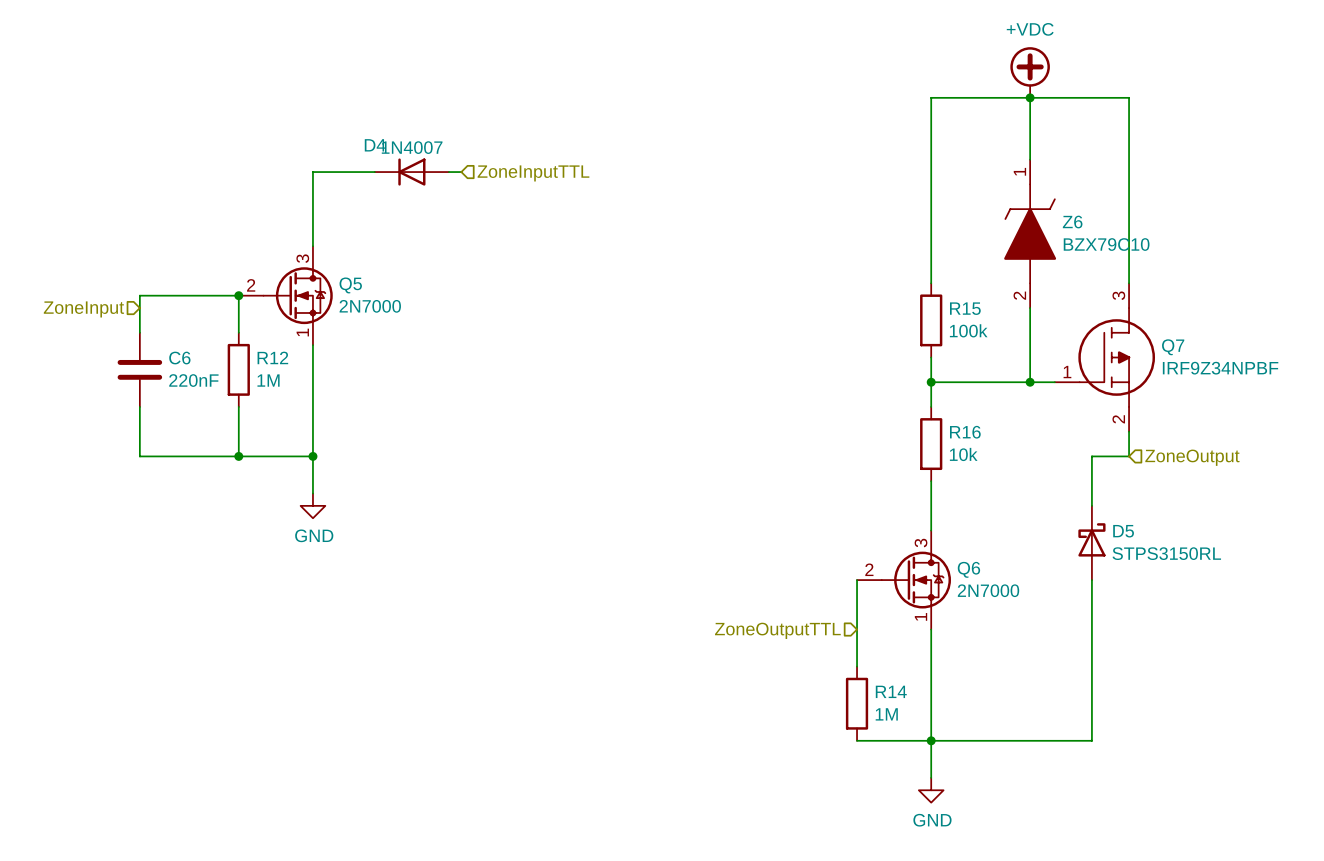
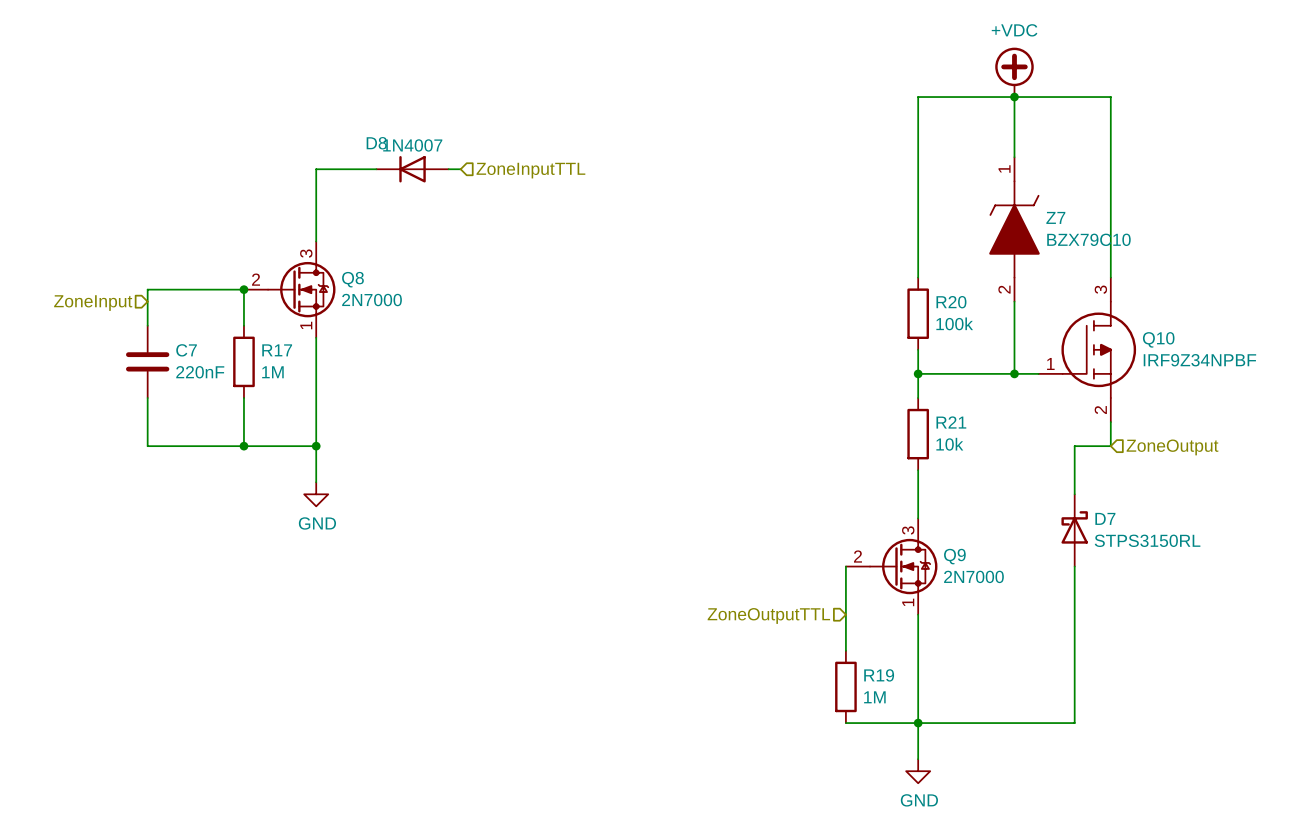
D4 name: D4 (375, 145) -> D8 (376, 143)
Z6 name: Z6 (1072, 222) -> Z7 (1055, 217)
Q5 name: Q5 (350, 285) -> Q8 (352, 279)
R15 name: R15 (965, 308) -> R20 (951, 302)
Q7 name: Q7 (1173, 347) -> Q10 (1158, 339)
R12 name: R12 (272, 357) -> R17 (277, 350)
C6 name: C6 (179, 358) -> C7 (186, 350)
R16 name: R16 (965, 432) -> R21 (951, 422)
D5 name: D5 (1123, 531) -> D7 (1105, 518)
Q6 name: Q6 (968, 569) -> Q9 (954, 556)
R14 name: R14 (891, 691) -> R19 (879, 675)

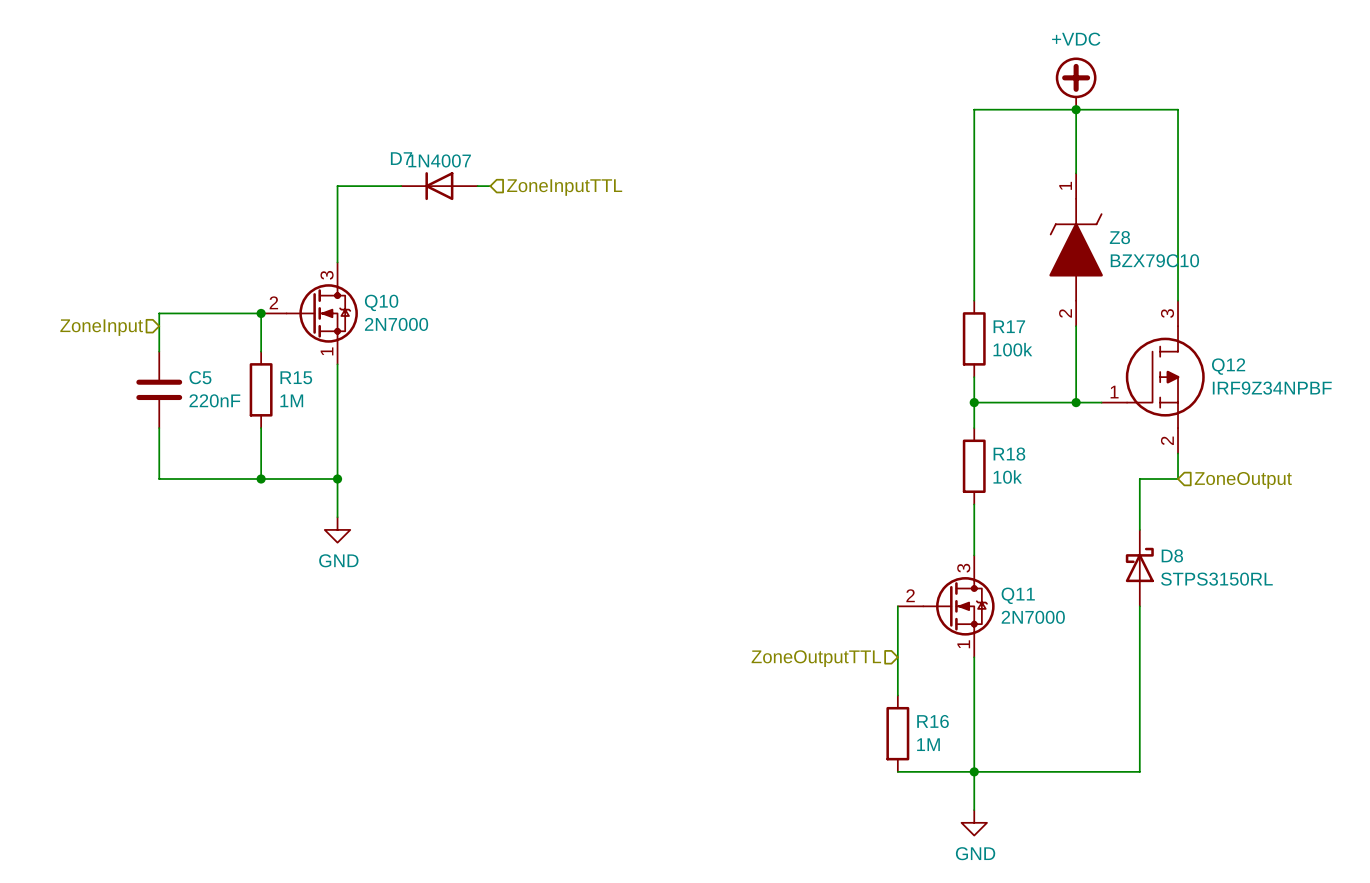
D8 name: D8 (376, 143) -> D7 (401, 158)
Z7 name: Z7 (1055, 217) -> Z8 (1119, 237)
Q8 name: Q8 (352, 279) -> Q10 (381, 302)
R20 name: R20 (951, 302) -> R17 (1009, 326)
Q10 name: Q10 (1158, 339) -> Q12 (1228, 366)
C7 name: C7 (186, 350) -> C5 (200, 377)
R17 name: R17 (277, 350) -> R15 (296, 377)
R21 name: R21 (951, 422) -> R18 (1009, 454)
D7 name: D7 (1105, 518) -> D8 (1172, 555)
Q9 name: Q9 (954, 556) -> Q11 (1018, 595)
R19 name: R19 (879, 675) -> R16 (933, 721)

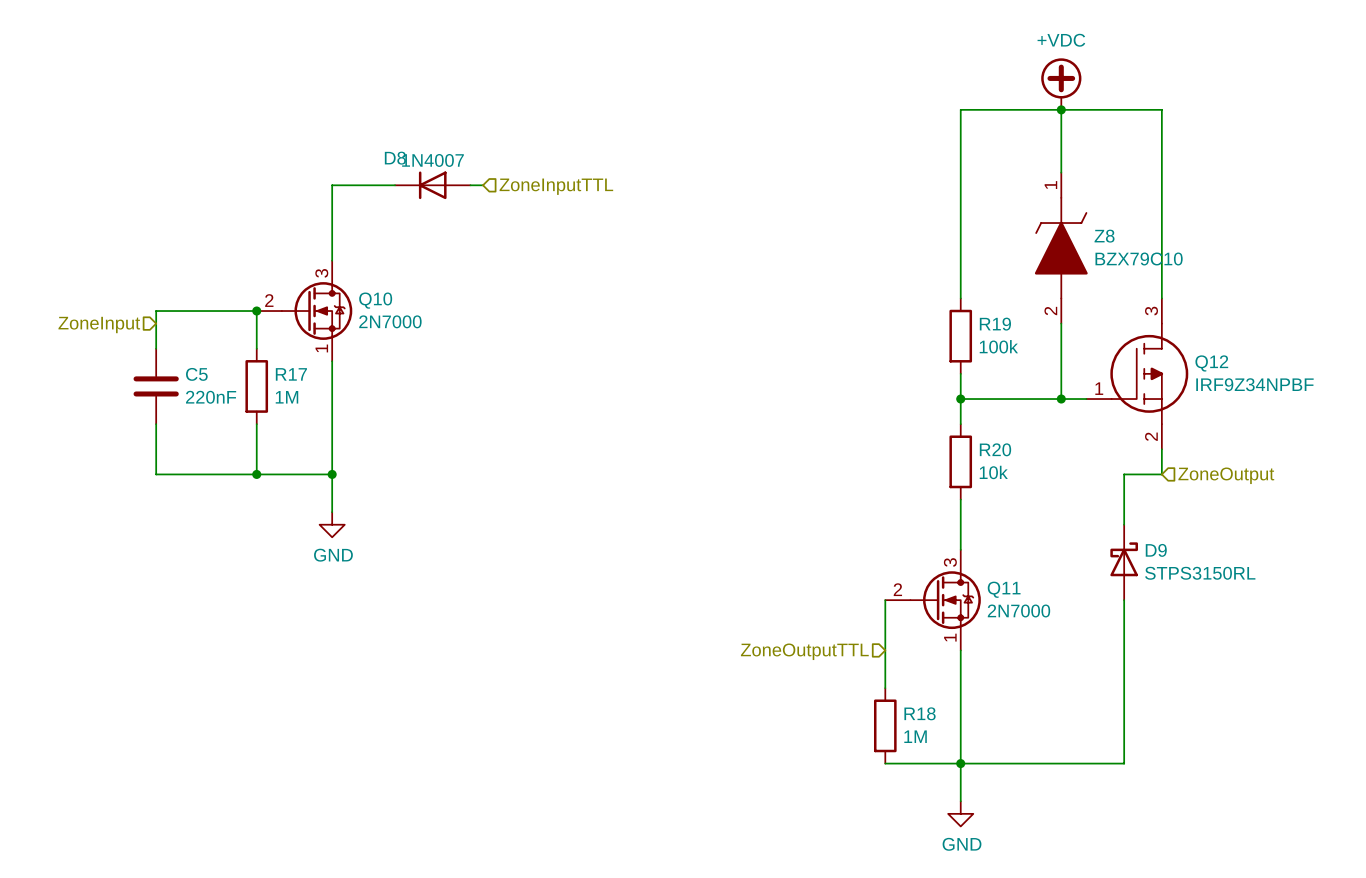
D7 name: D7 (401, 158) -> D8 (395, 158)
R17 name: R17 (1009, 326) -> R19 (995, 324)
R15 name: R15 (296, 377) -> R17 (291, 374)
R18 name: R18 (1009, 454) -> R20 (995, 449)
D8 name: D8 (1172, 555) -> D9 (1156, 550)
R16 name: R16 (933, 721) -> R18 (920, 713)

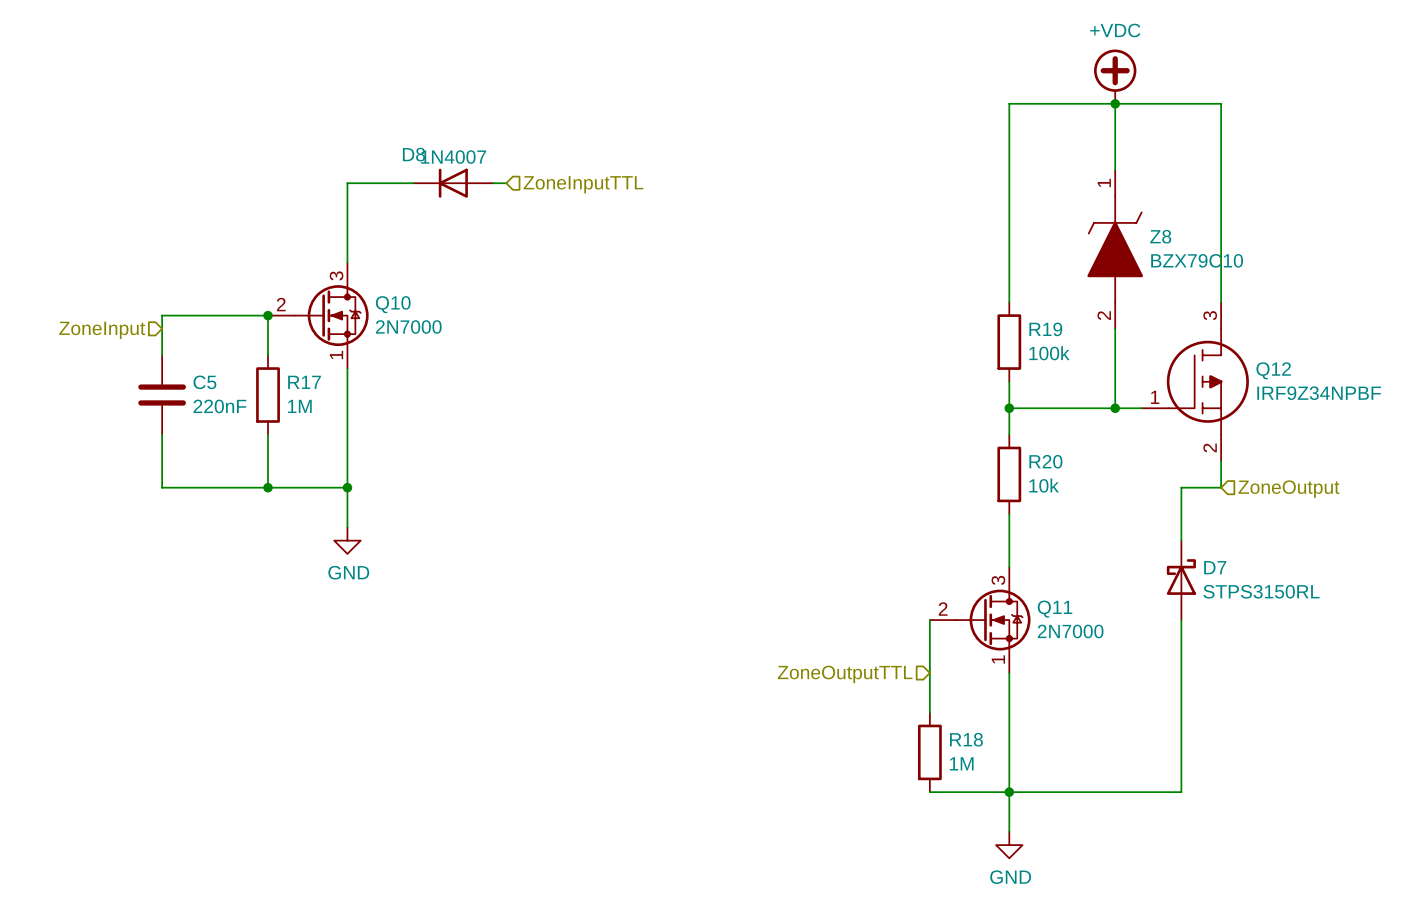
D9 name: D9 (1156, 550) -> D7 (1215, 567)

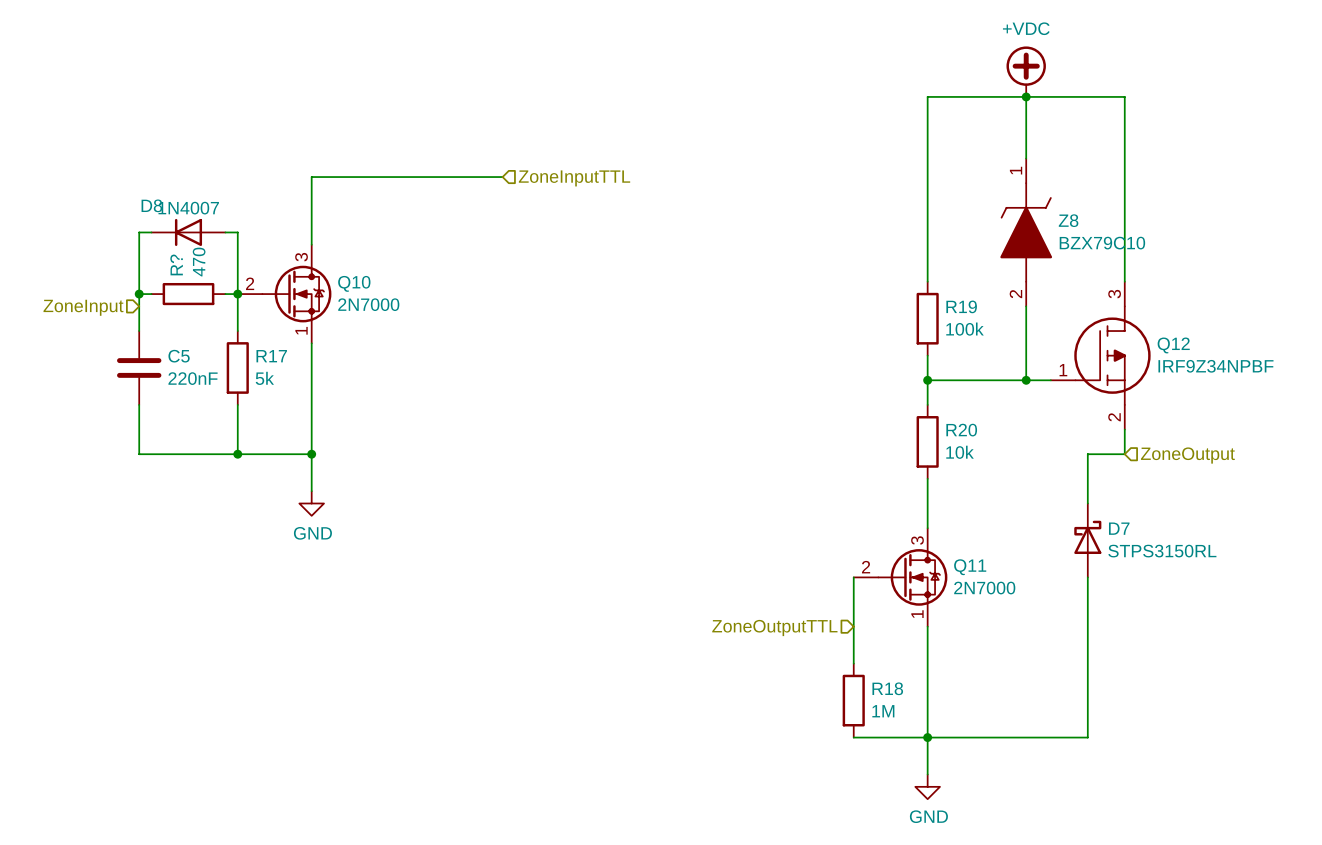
wire: (413, 183) (347, 183) (347, 189) -> (502, 177) (311, 177)
D8 position: (453, 183) -> (188, 232)
wire: (493, 183) (506, 183) -> none
hierarchical label position: ZoneInputTTL (583, 184) -> ZoneInputTTL (574, 178)
wire: none -> (151, 232) (139, 232) (139, 294)
wire: none -> (225, 232) (237, 232) (237, 294)
junction: none -> (139, 294)
wire: (175, 315) (254, 315) -> none
R?: none -> 470 (188, 294)
R17 value: 1M (299, 406) -> 5k (264, 378)

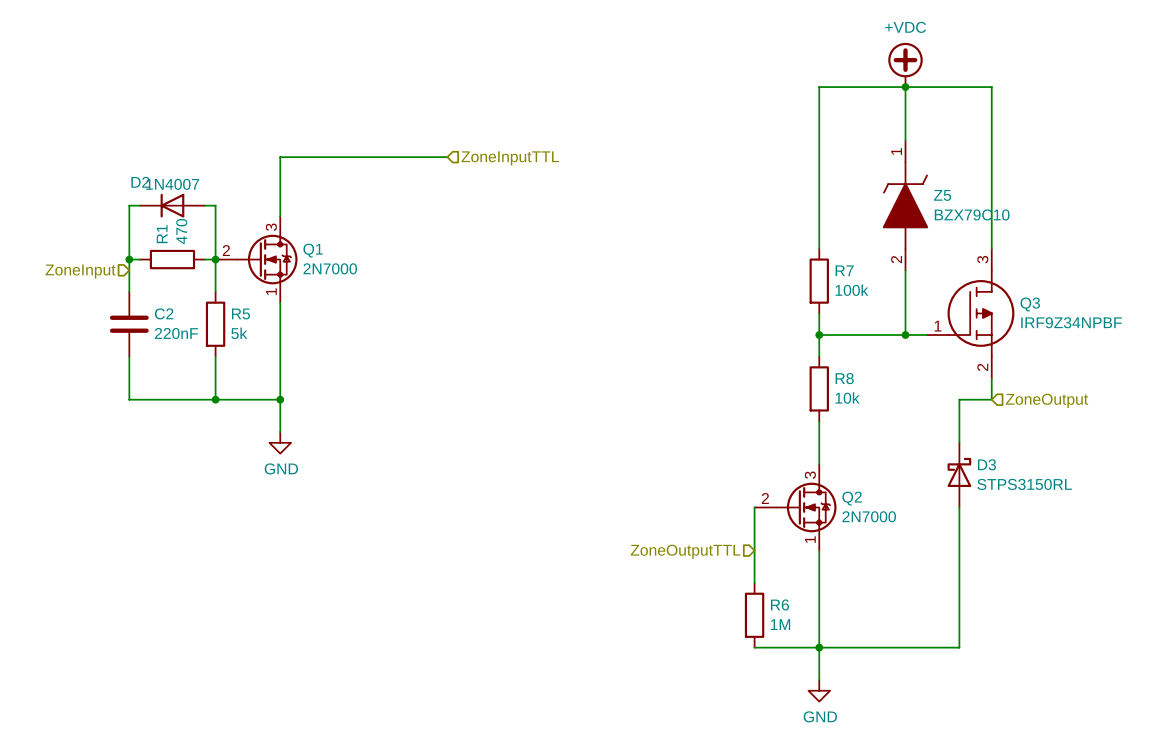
D8 name: D8 (151, 205) -> D2 (140, 182)
Z8 name: Z8 (1068, 220) -> Z5 (942, 195)
R? name: R? (176, 264) -> R1 (162, 234)
Q10 name: Q10 (354, 283) -> Q1 (313, 250)
R19 name: R19 (961, 306) -> R7 (844, 270)
Q12 name: Q12 (1173, 345) -> Q3 (1030, 304)
C5 name: C5 (179, 356) -> C2 (164, 313)
R17 name: R17 (271, 356) -> R5 (241, 313)
R20 name: R20 (961, 430) -> R8 (844, 378)
D7 name: D7 (1119, 528) -> D3 (986, 464)
Q11 name: Q11 (970, 567) -> Q2 (852, 498)
R18 name: R18 (887, 688) -> R6 (779, 604)

